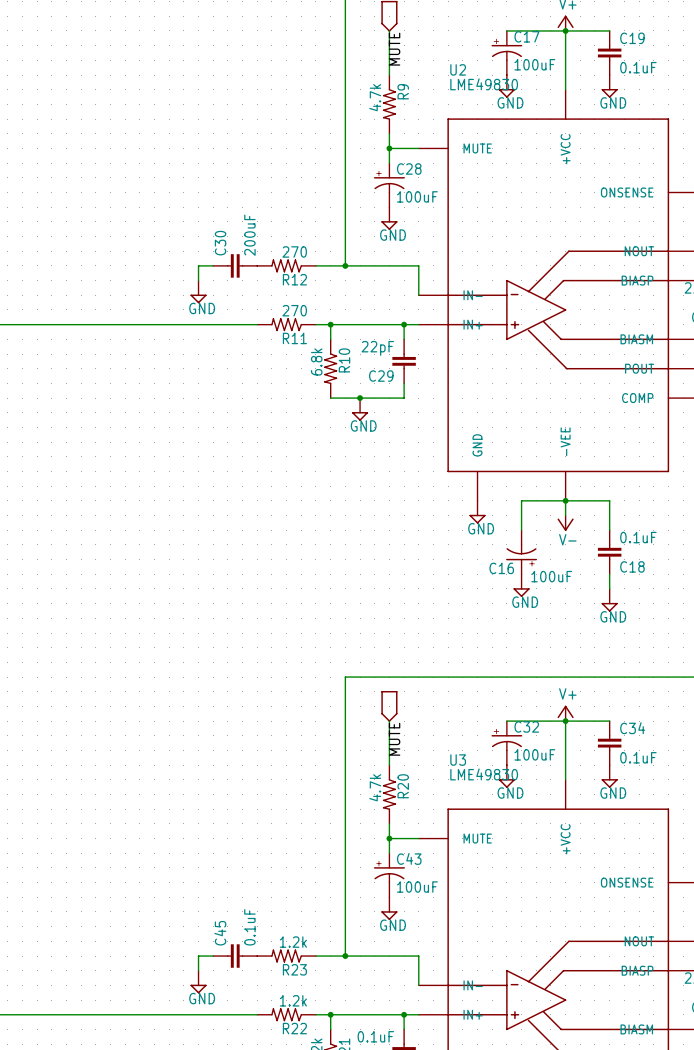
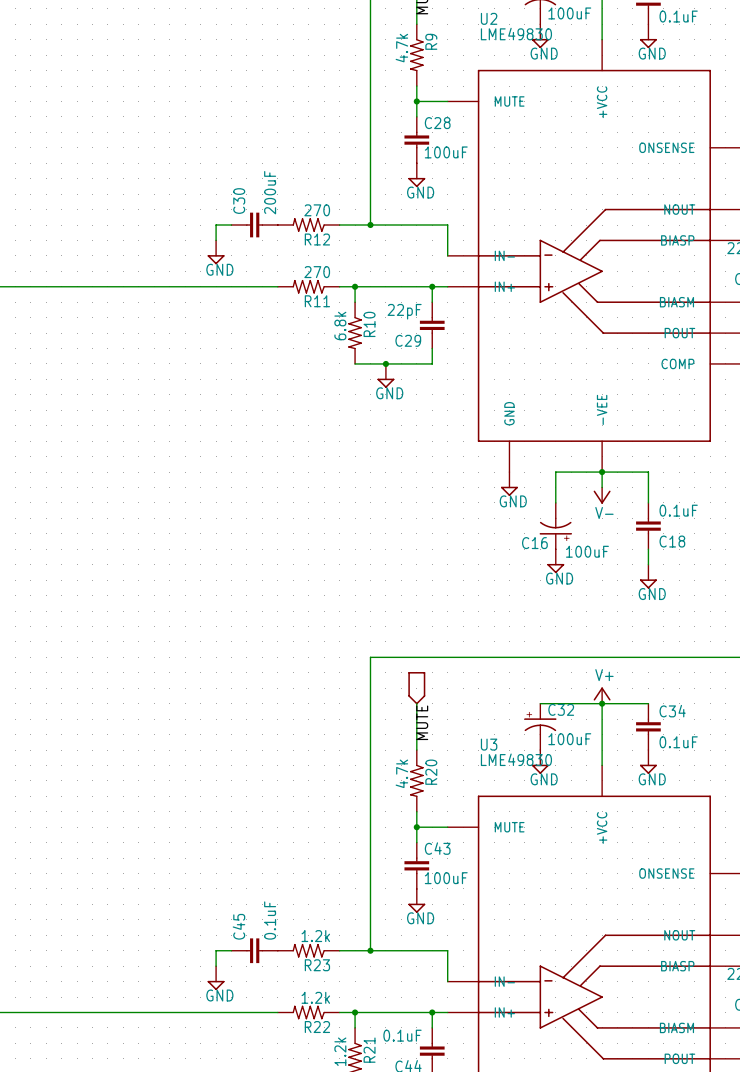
C28 symbol: [373, 163, 405, 208] -> [404, 116, 430, 164]
C43 symbol: [373, 853, 405, 898] -> [404, 842, 430, 889]

